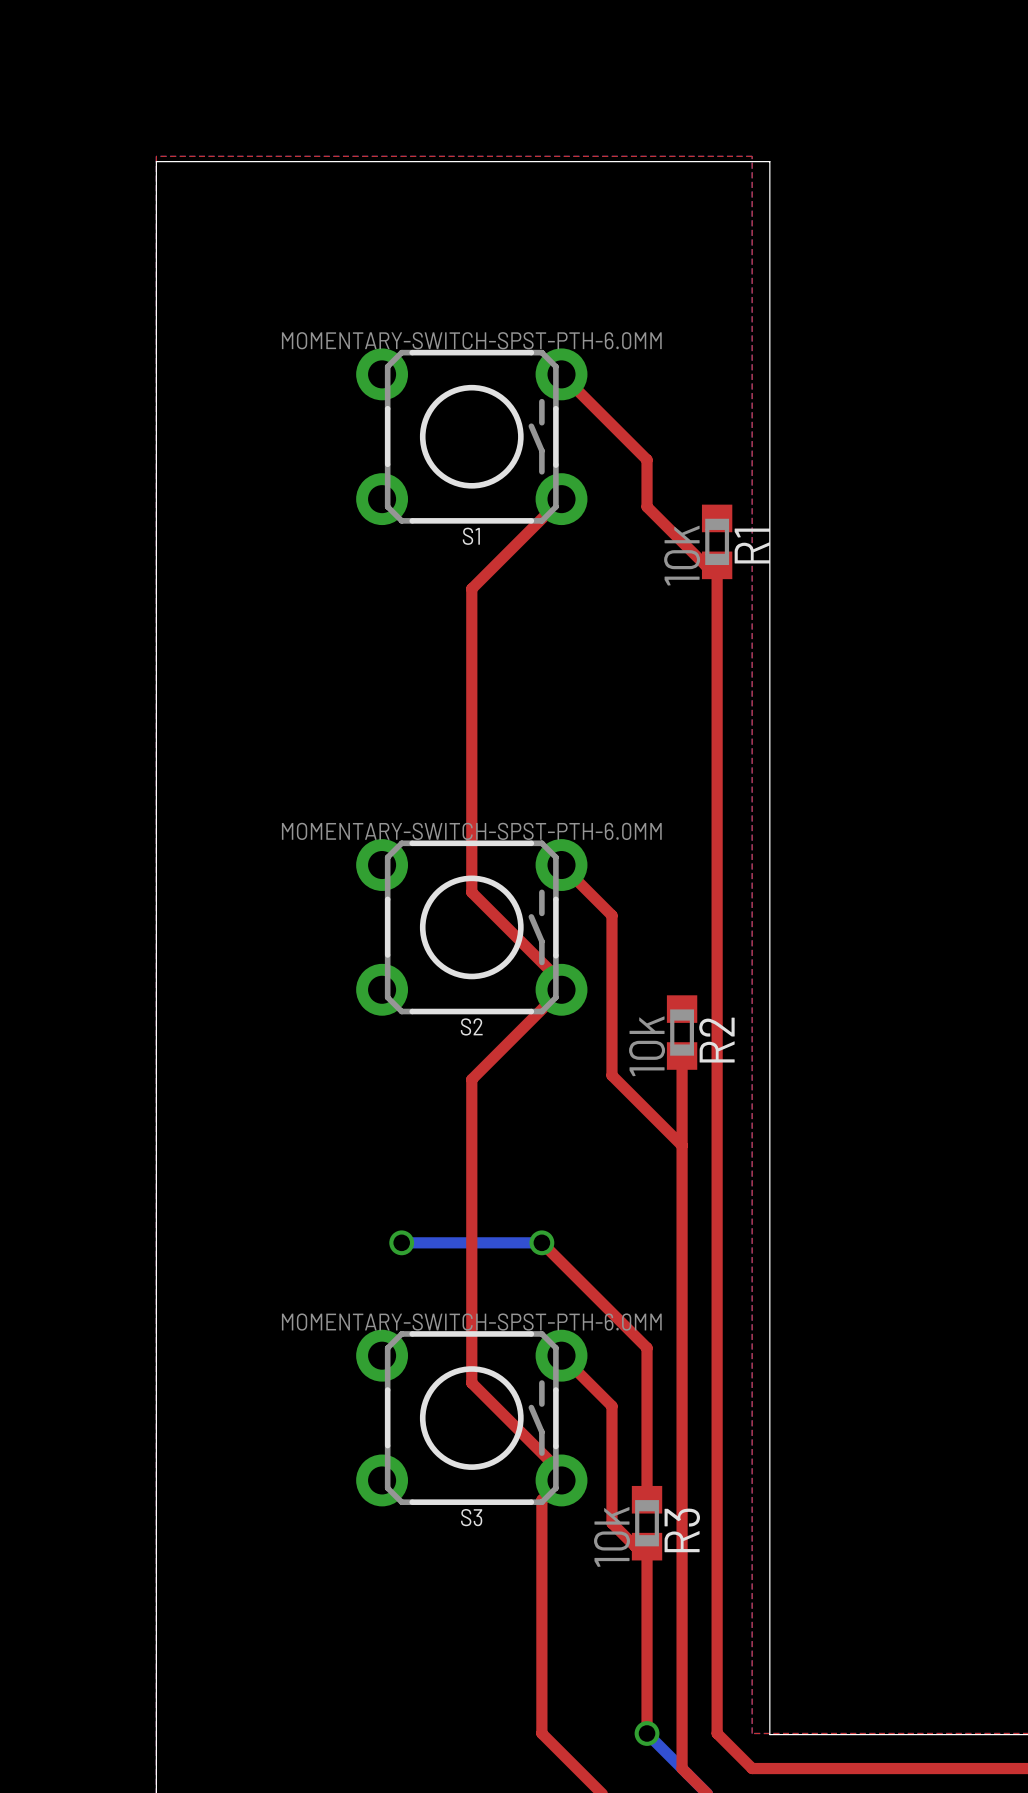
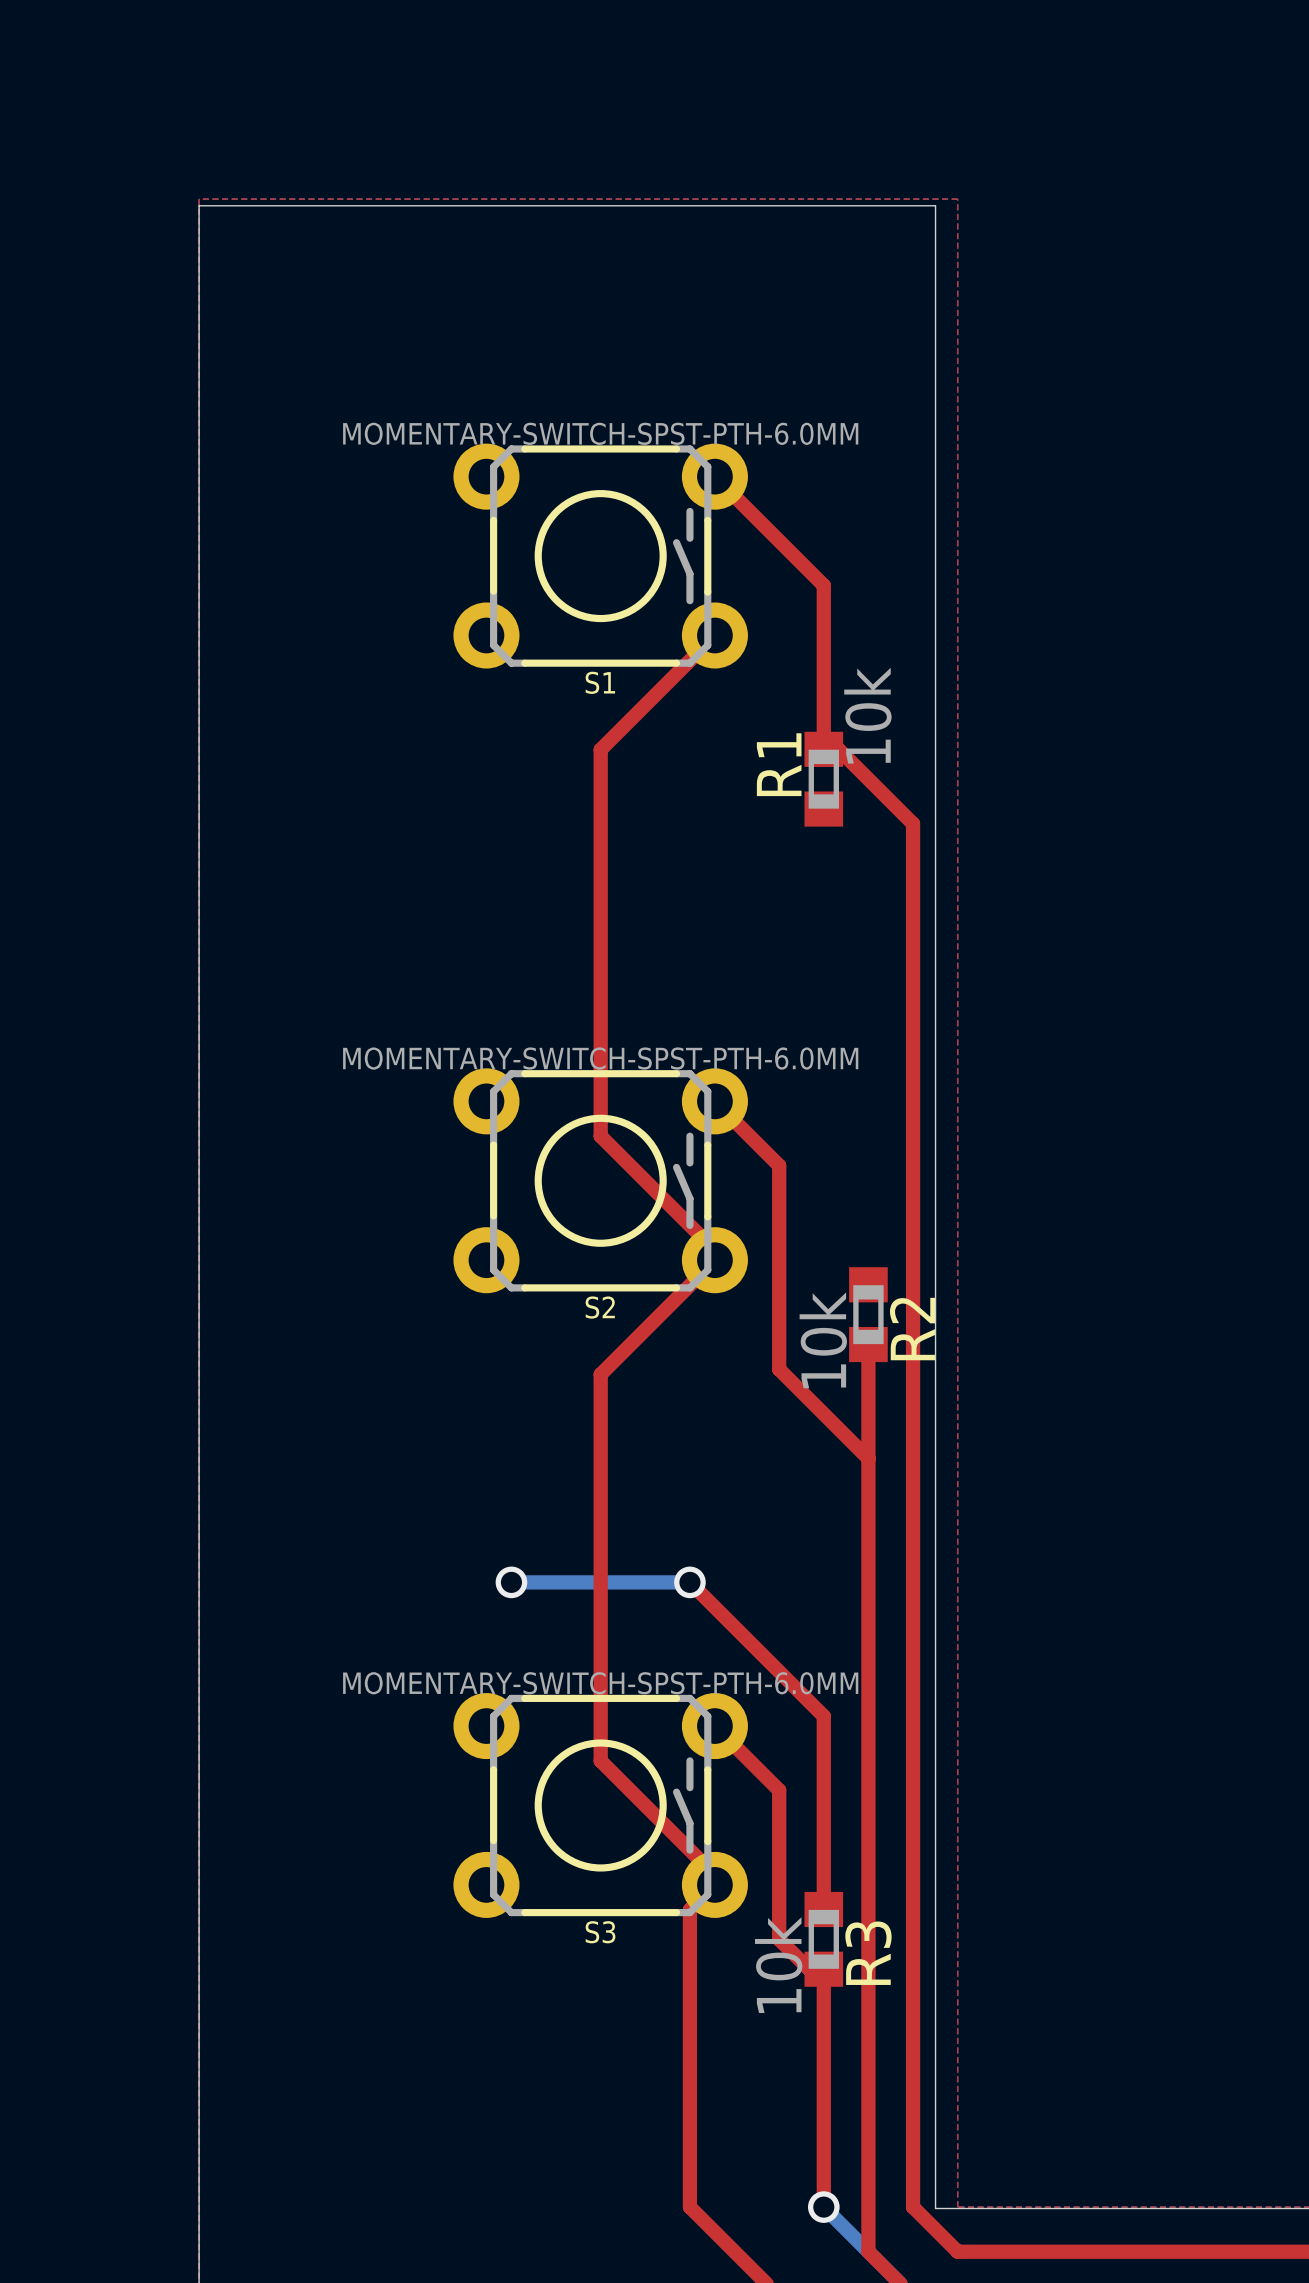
board edge: (734, 161) (769, 161) (769, 1734) -> (935, 205) (935, 2208) (980, 2208)
top track: (647, 506) (705, 565) (717, 565) (717, 647) -> (823, 645) (823, 749) (838, 749) (913, 823)
R1 position: (717, 541) -> (823, 779)
R1 name position: R1 (752, 546) -> R1 (779, 764)

